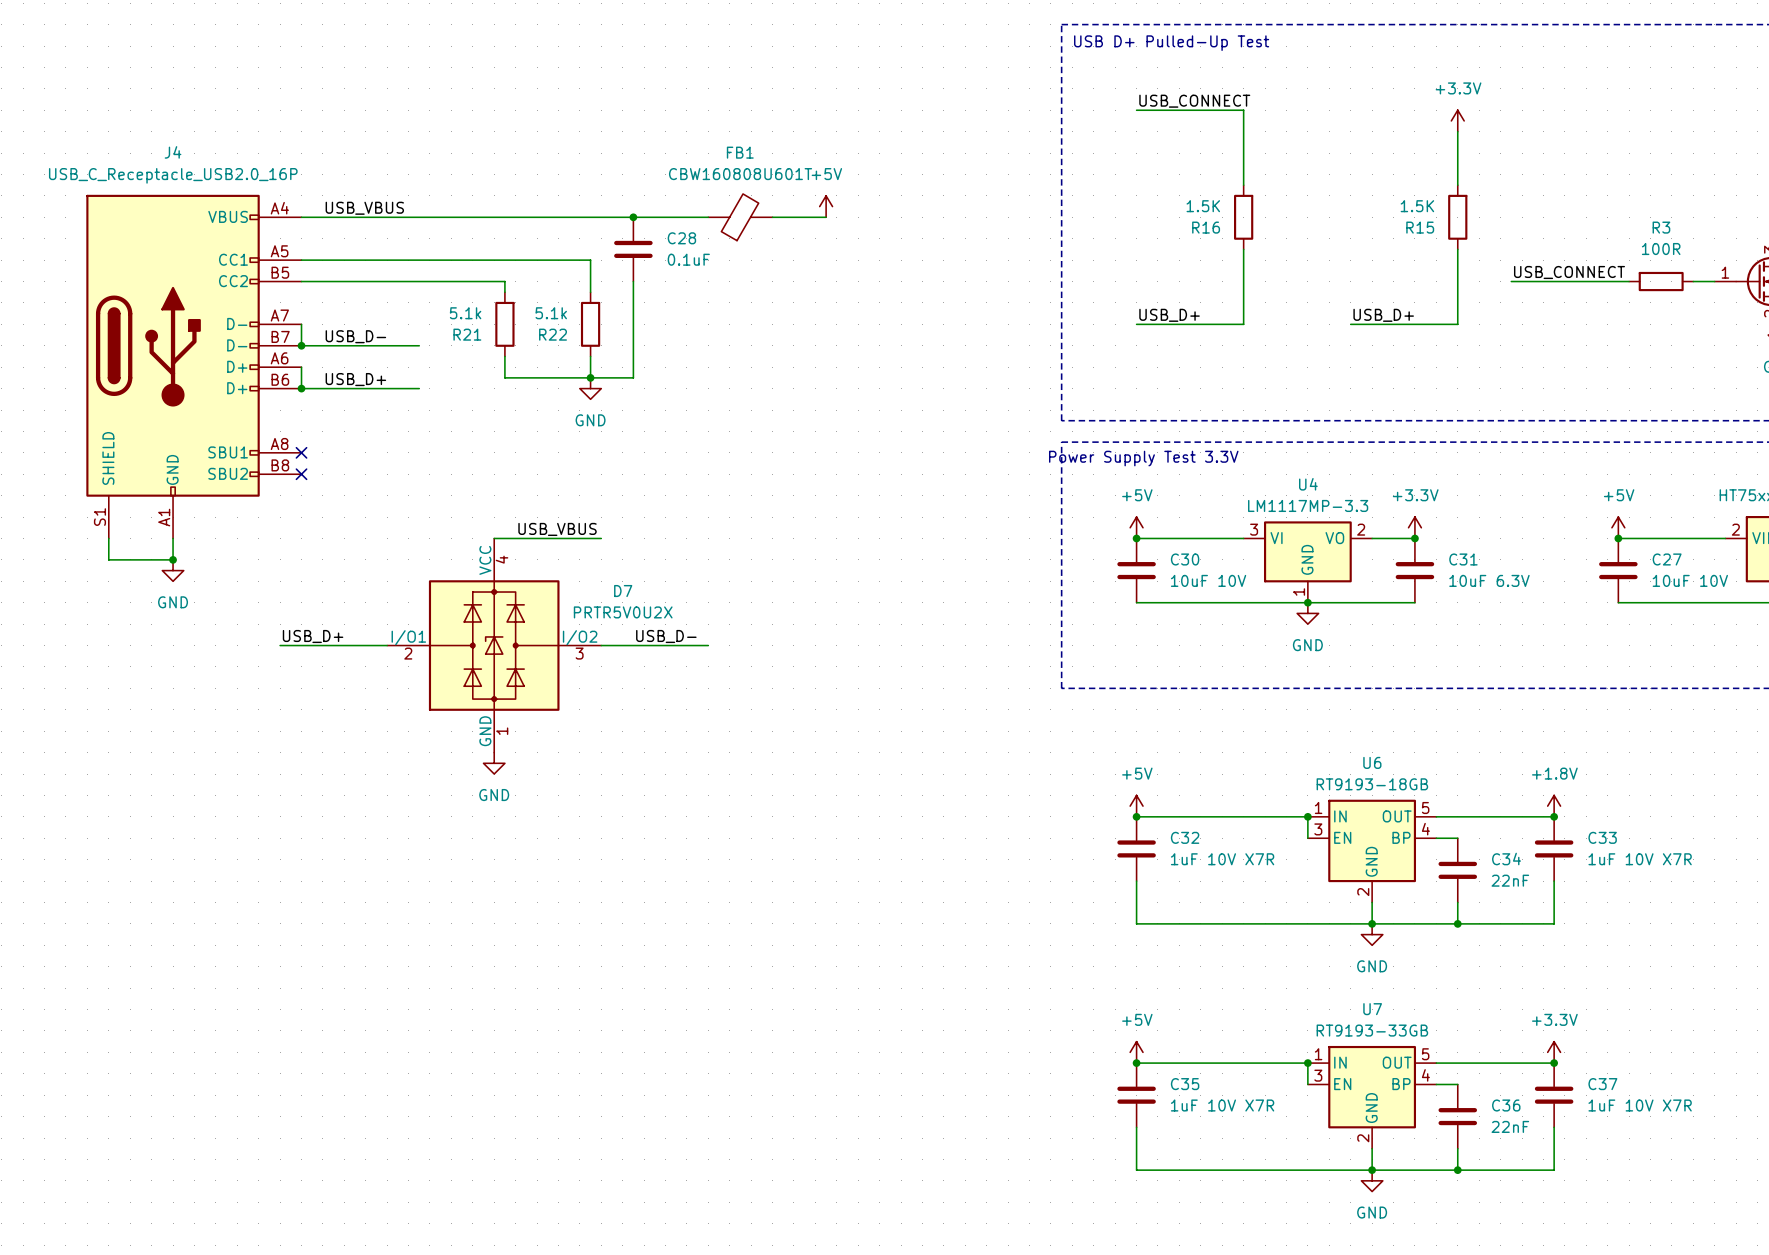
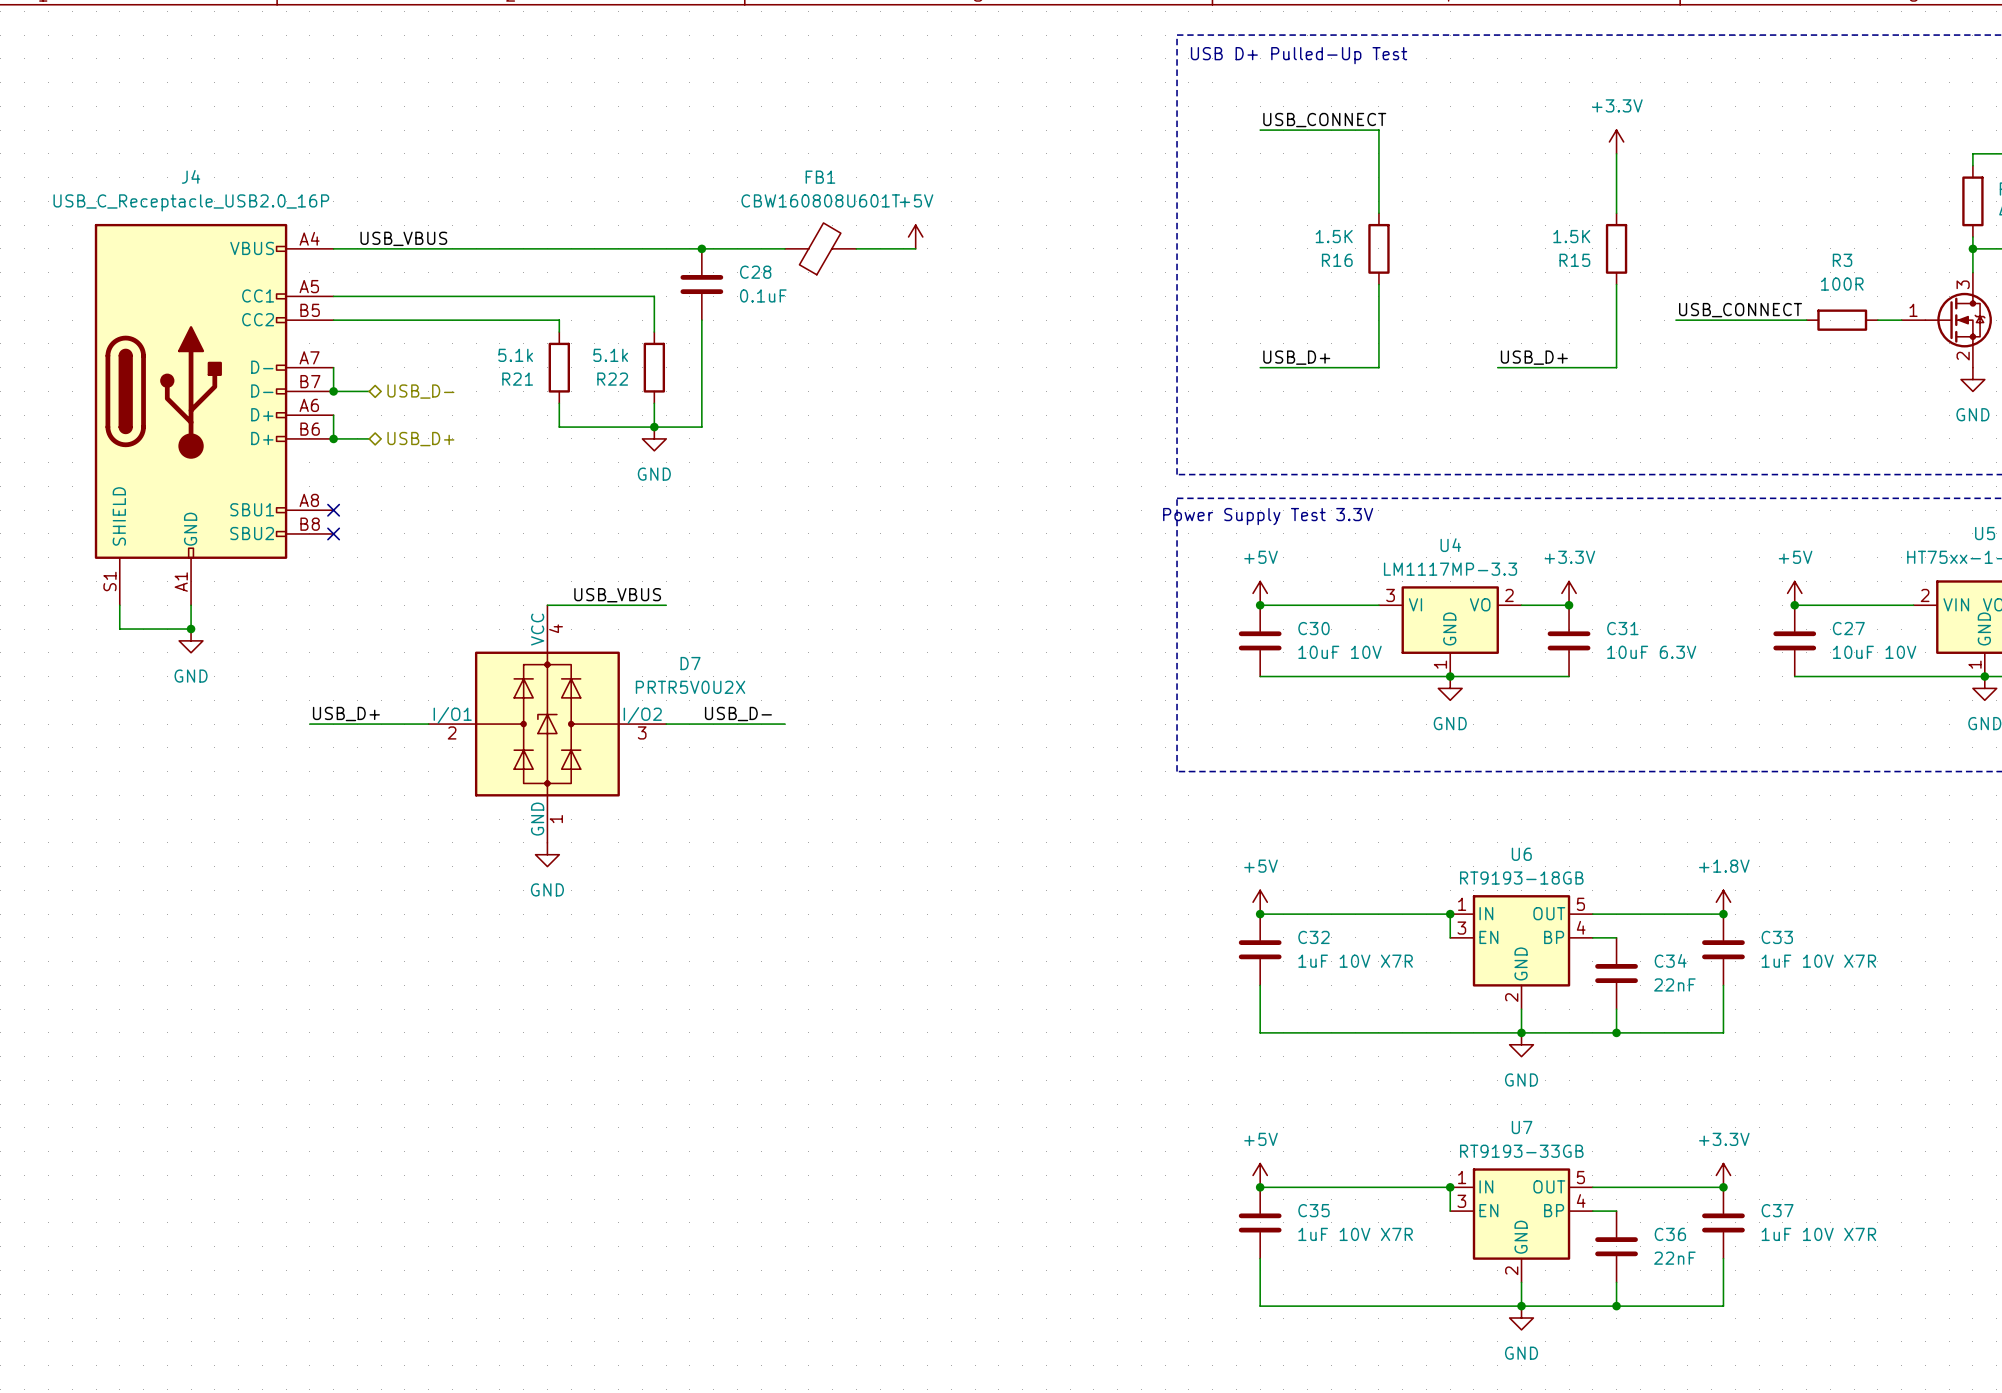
label: USB_D- (355, 336) -> none
wire: (333, 345) (419, 345) -> none
hierarchical label: none -> USB_D- (420, 391)
label: USB_D+ (355, 379) -> none
wire: (333, 388) (419, 388) -> none
hierarchical label: none -> USB_D+ (420, 439)

